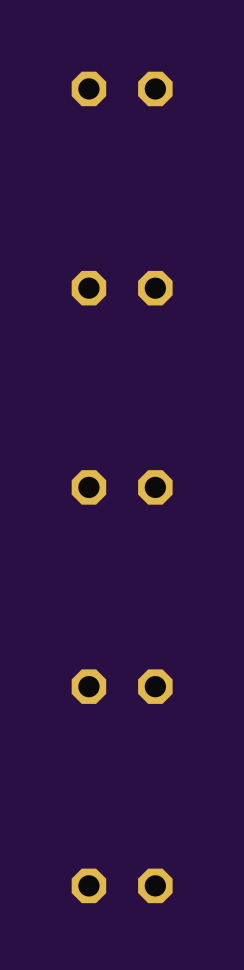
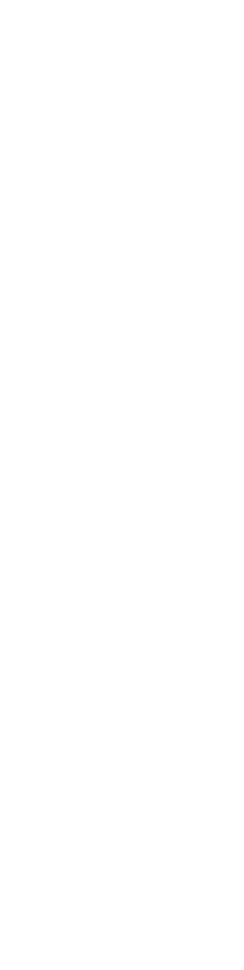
part: (122, 88) -> none
part: (122, 288) -> none
part: (122, 487) -> none
part: (122, 686) -> none
part: (122, 885) -> none

